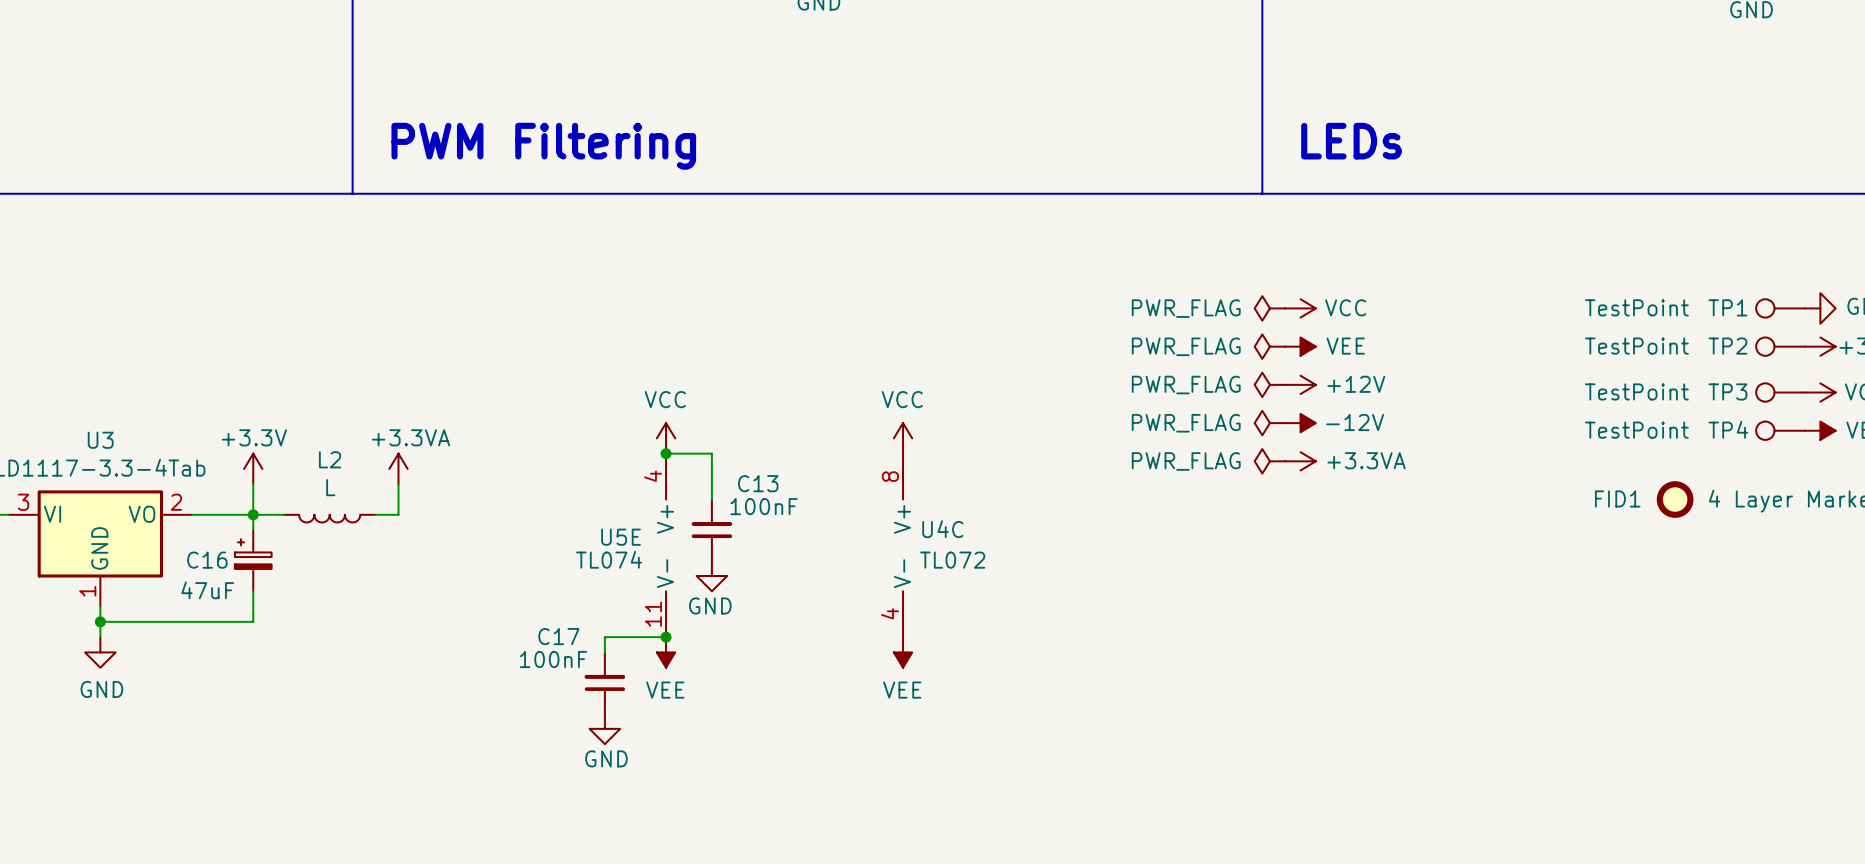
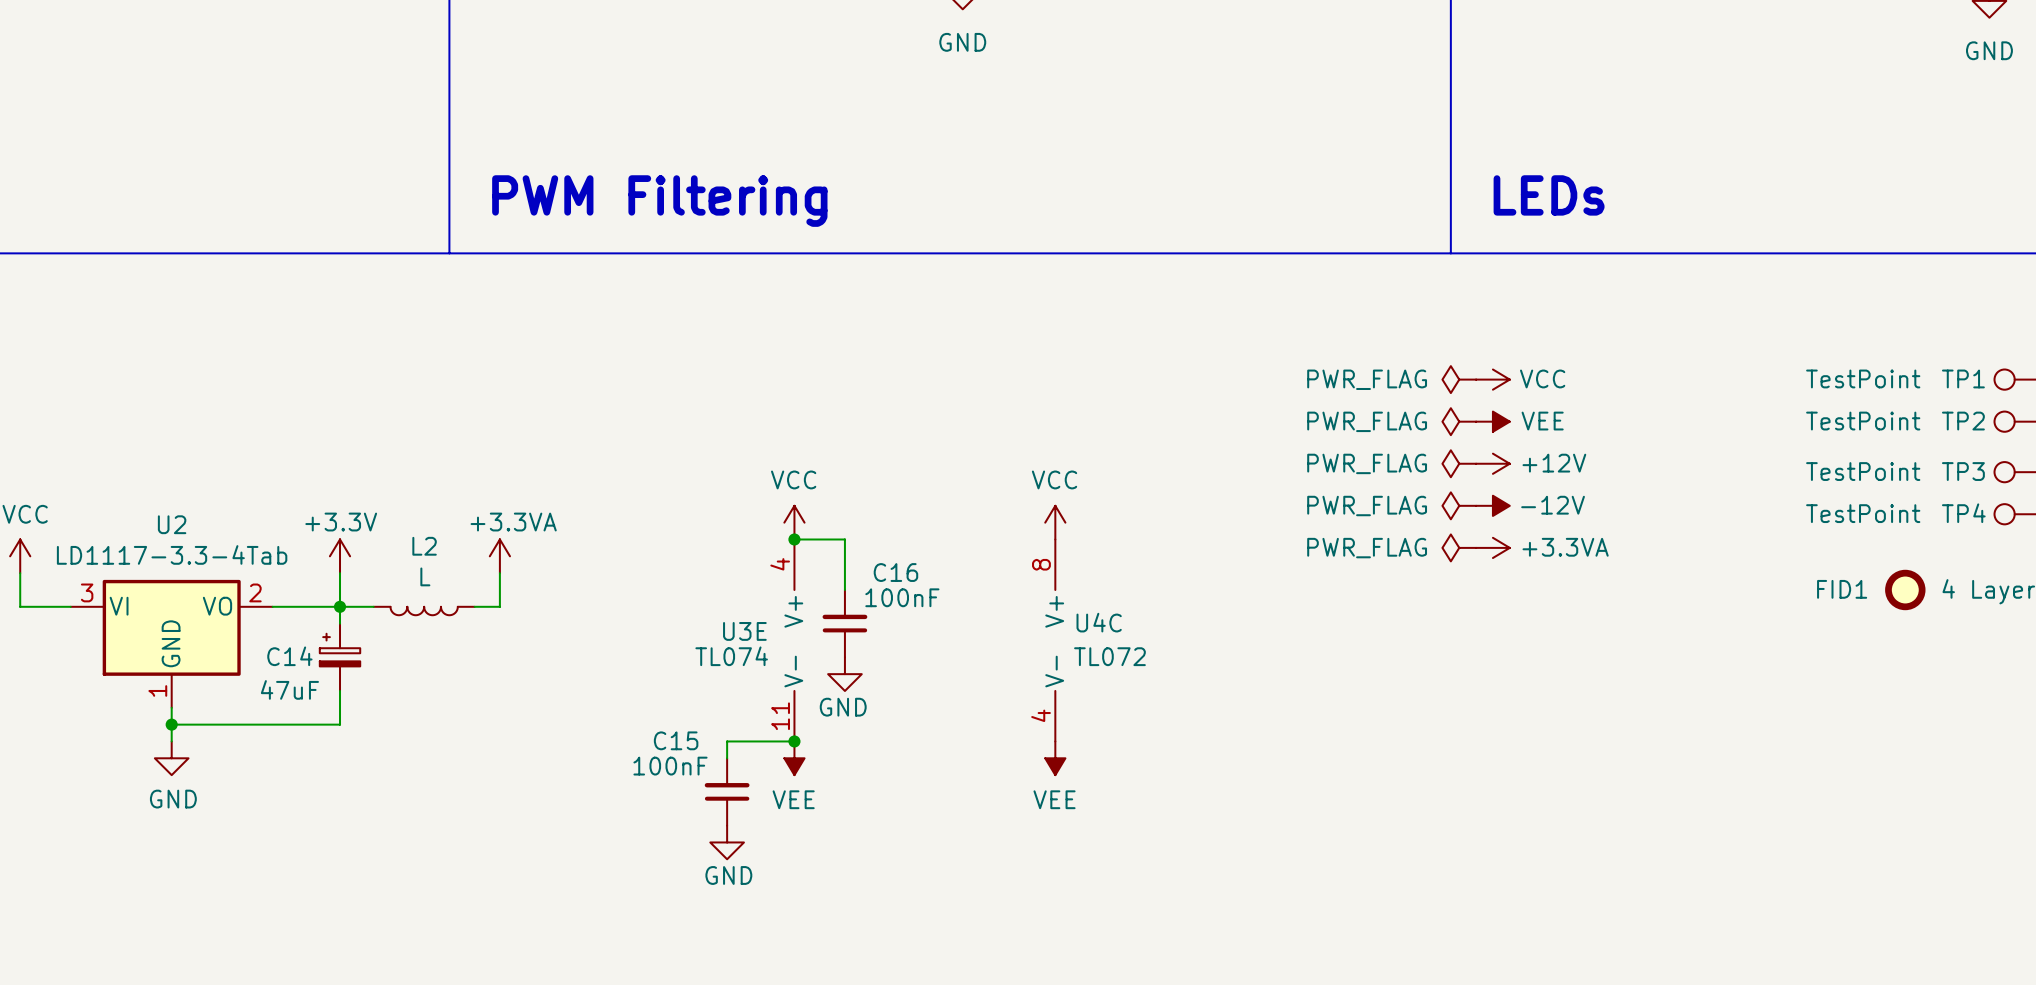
U3 name: U3 (100, 440) -> U2 (172, 524)
C13 name: C13 (758, 483) -> C16 (895, 572)
U5E name: U5E (621, 537) -> U3E (744, 631)
C16 name: C16 (207, 560) -> C14 (289, 656)
C17 name: C17 (558, 636) -> C15 (676, 740)

